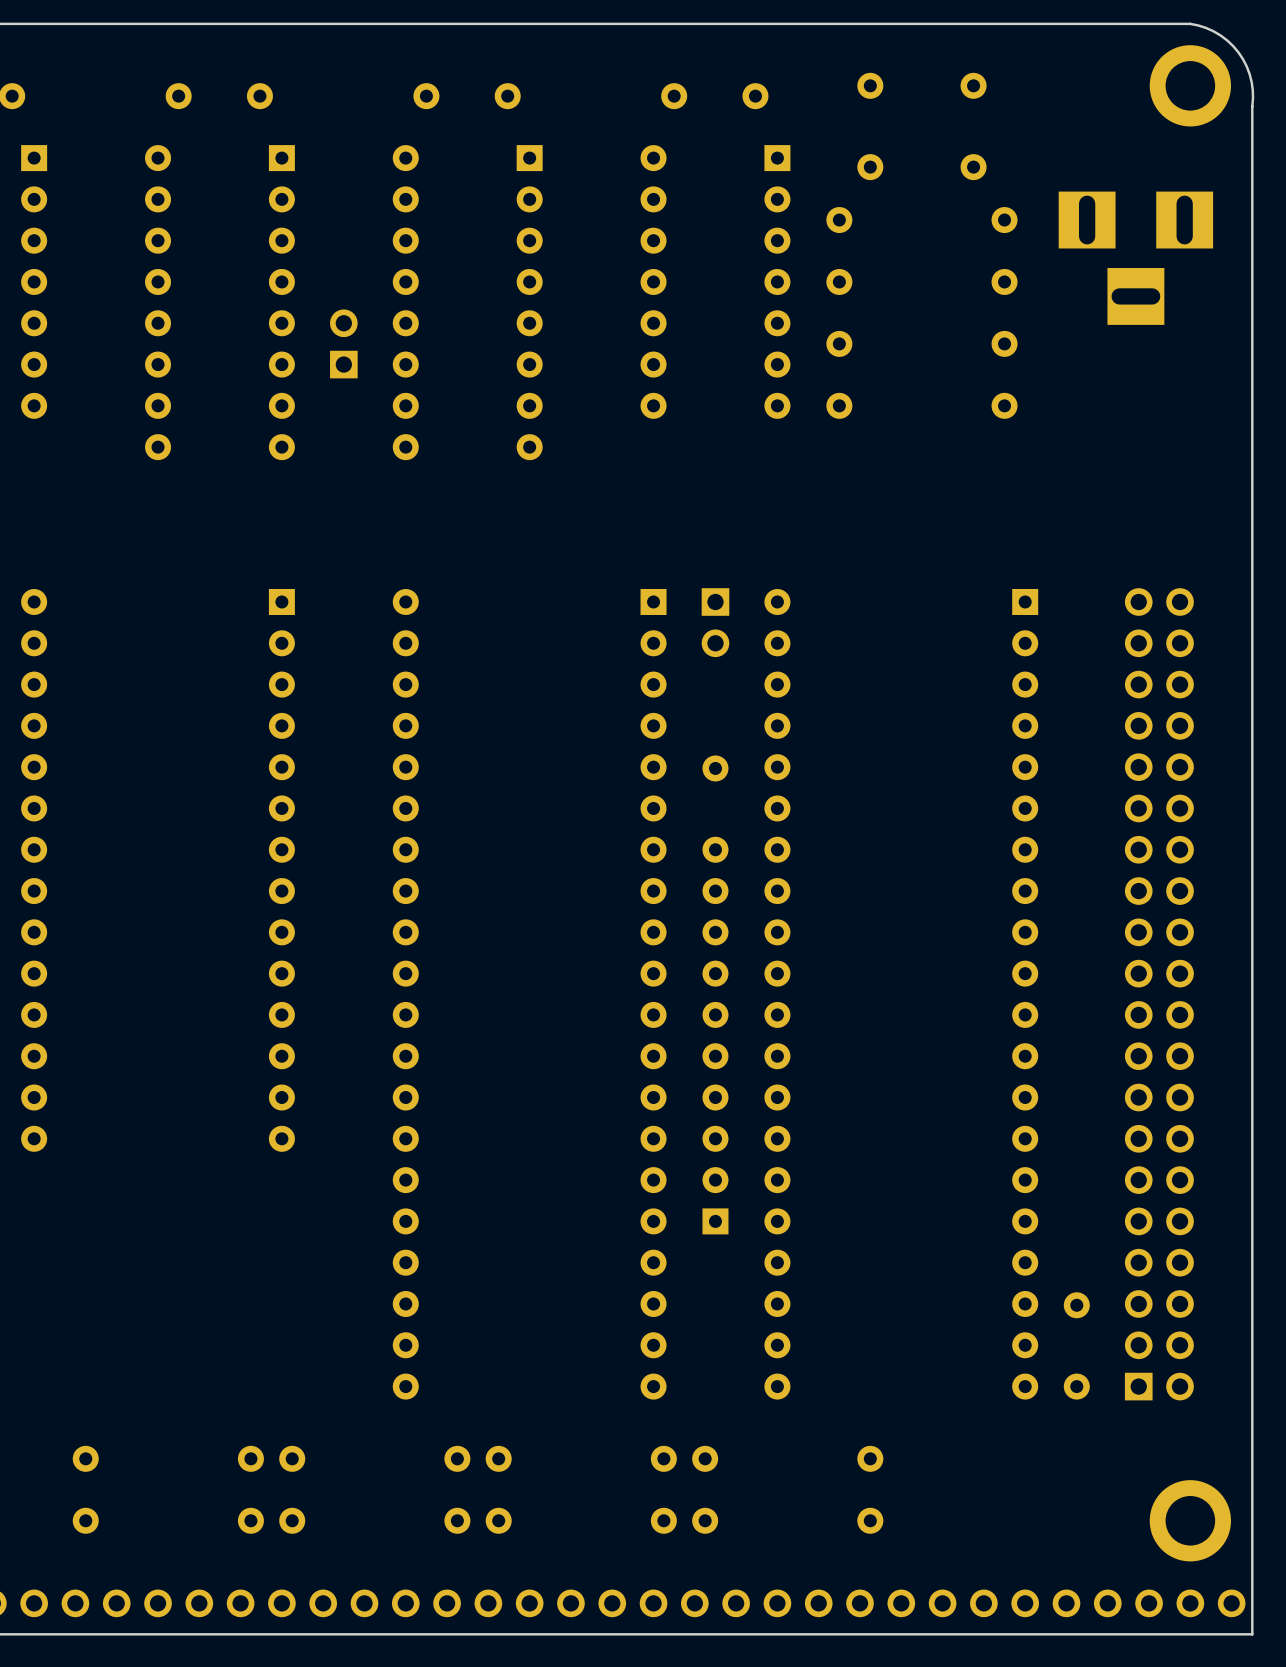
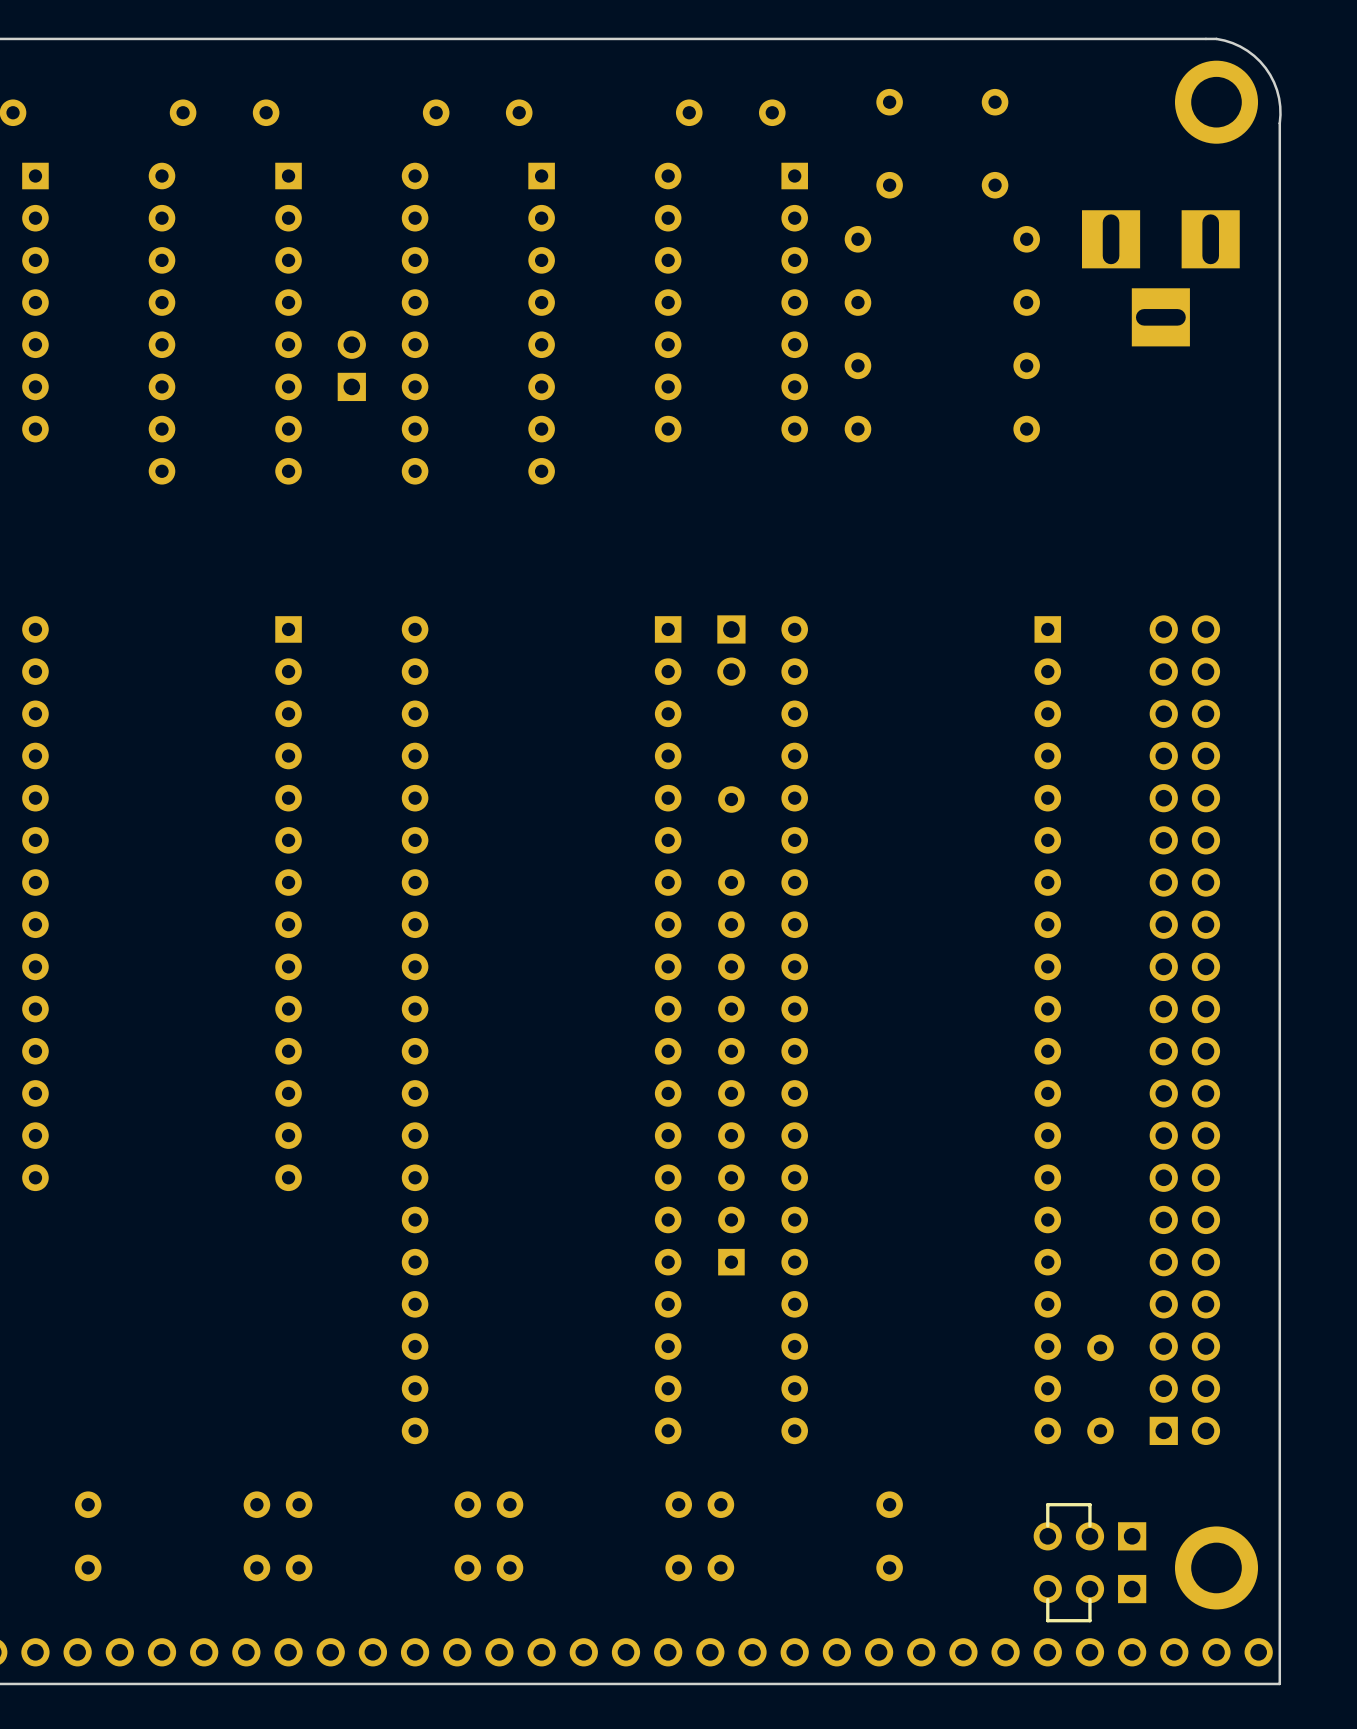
line: none -> (1089, 1525) (1089, 1504) (1047, 1504) (1047, 1525)
part: none -> (1089, 1536)
part: none -> (1089, 1589)
line: none -> (1089, 1599) (1089, 1620) (1047, 1620) (1047, 1599)

